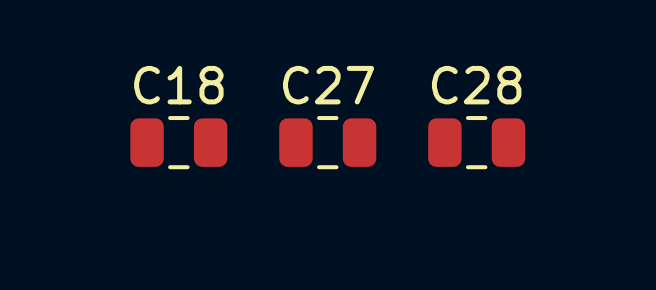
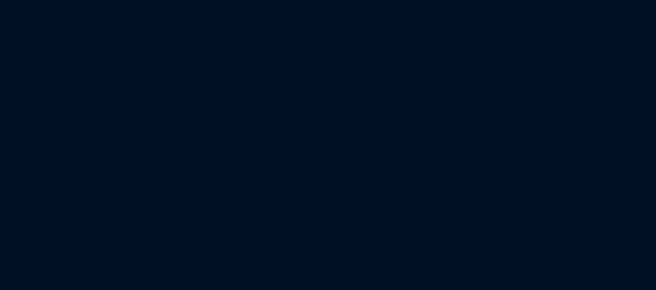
C18: (178, 142) -> none
C27: (327, 142) -> none
C28: (476, 142) -> none

